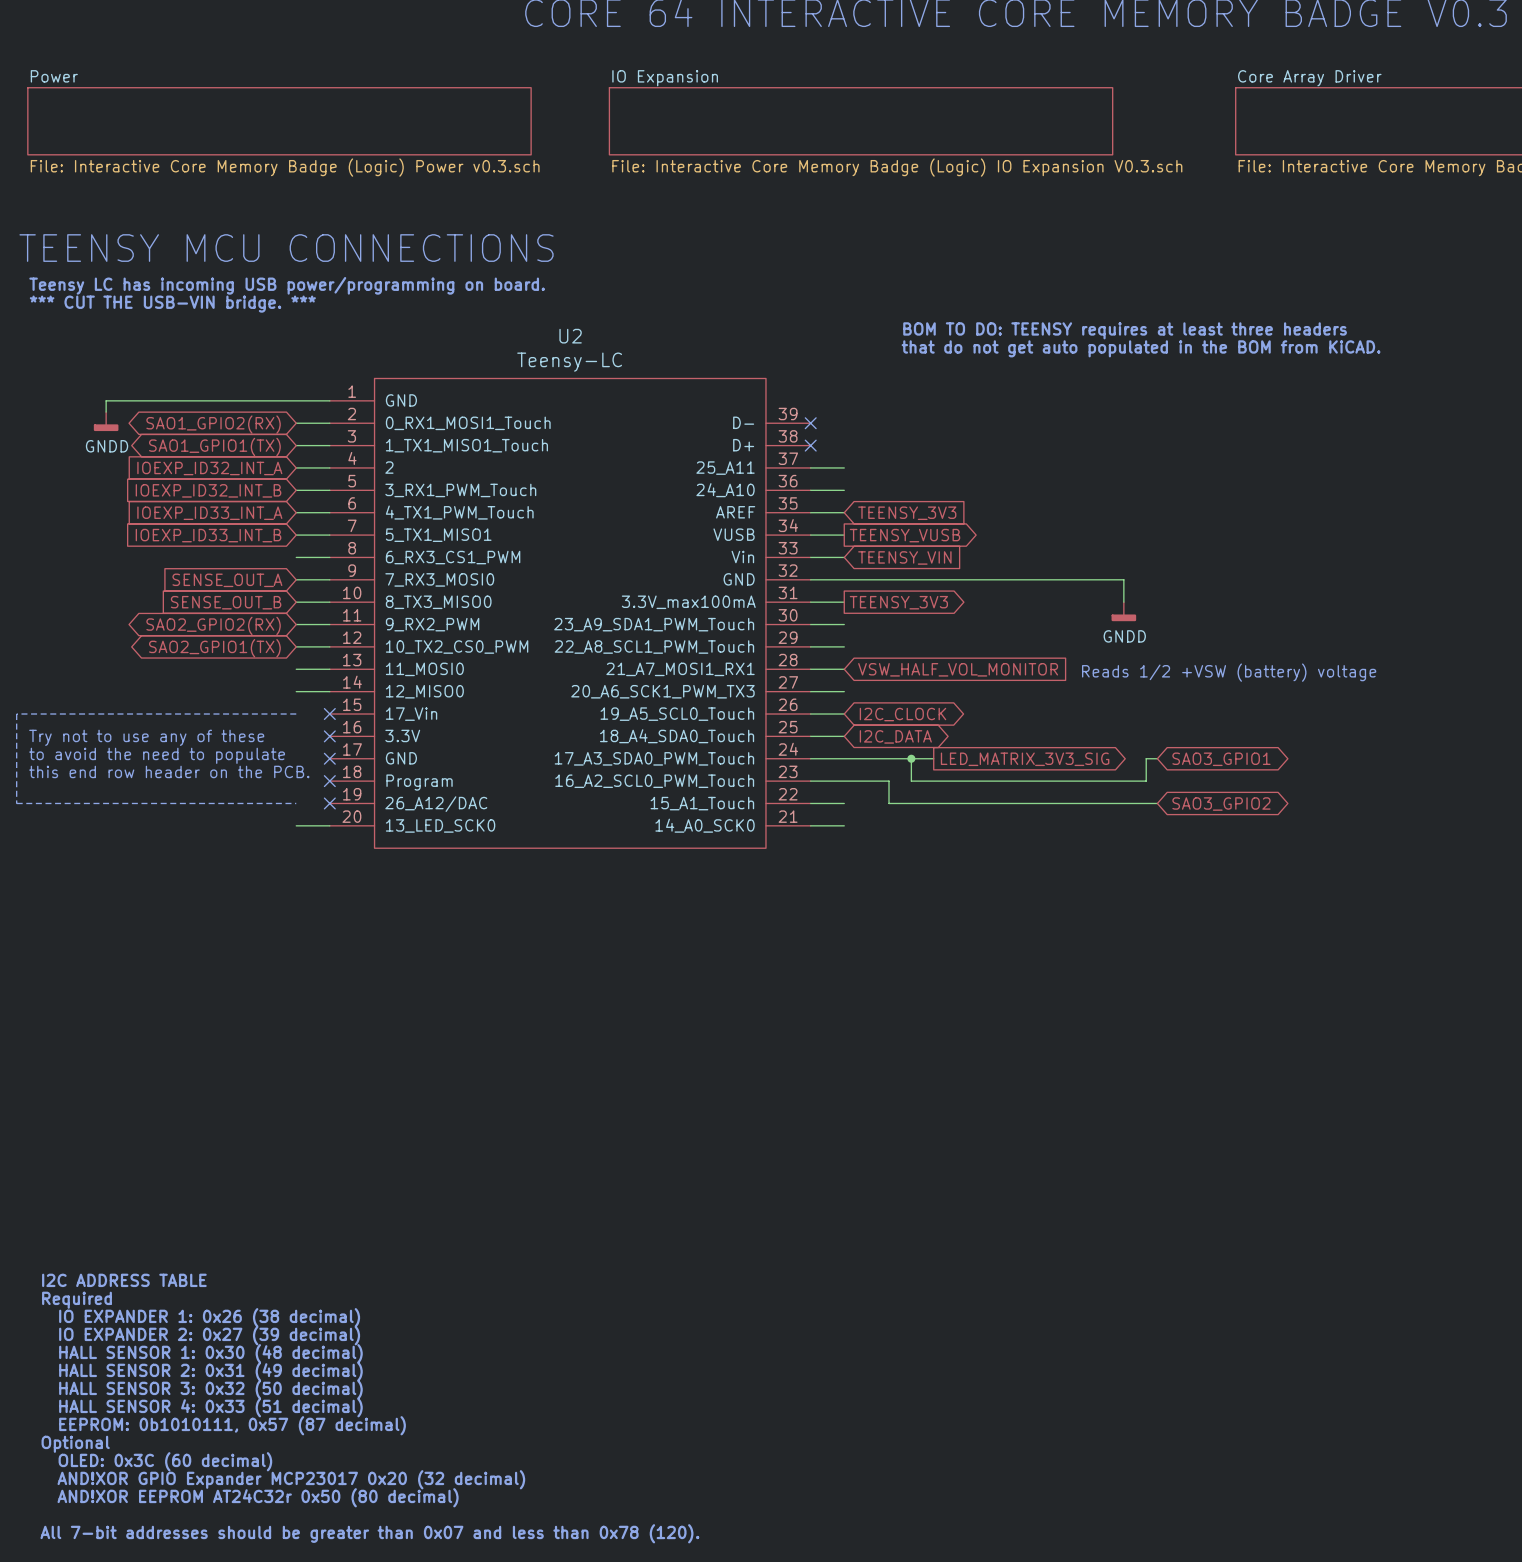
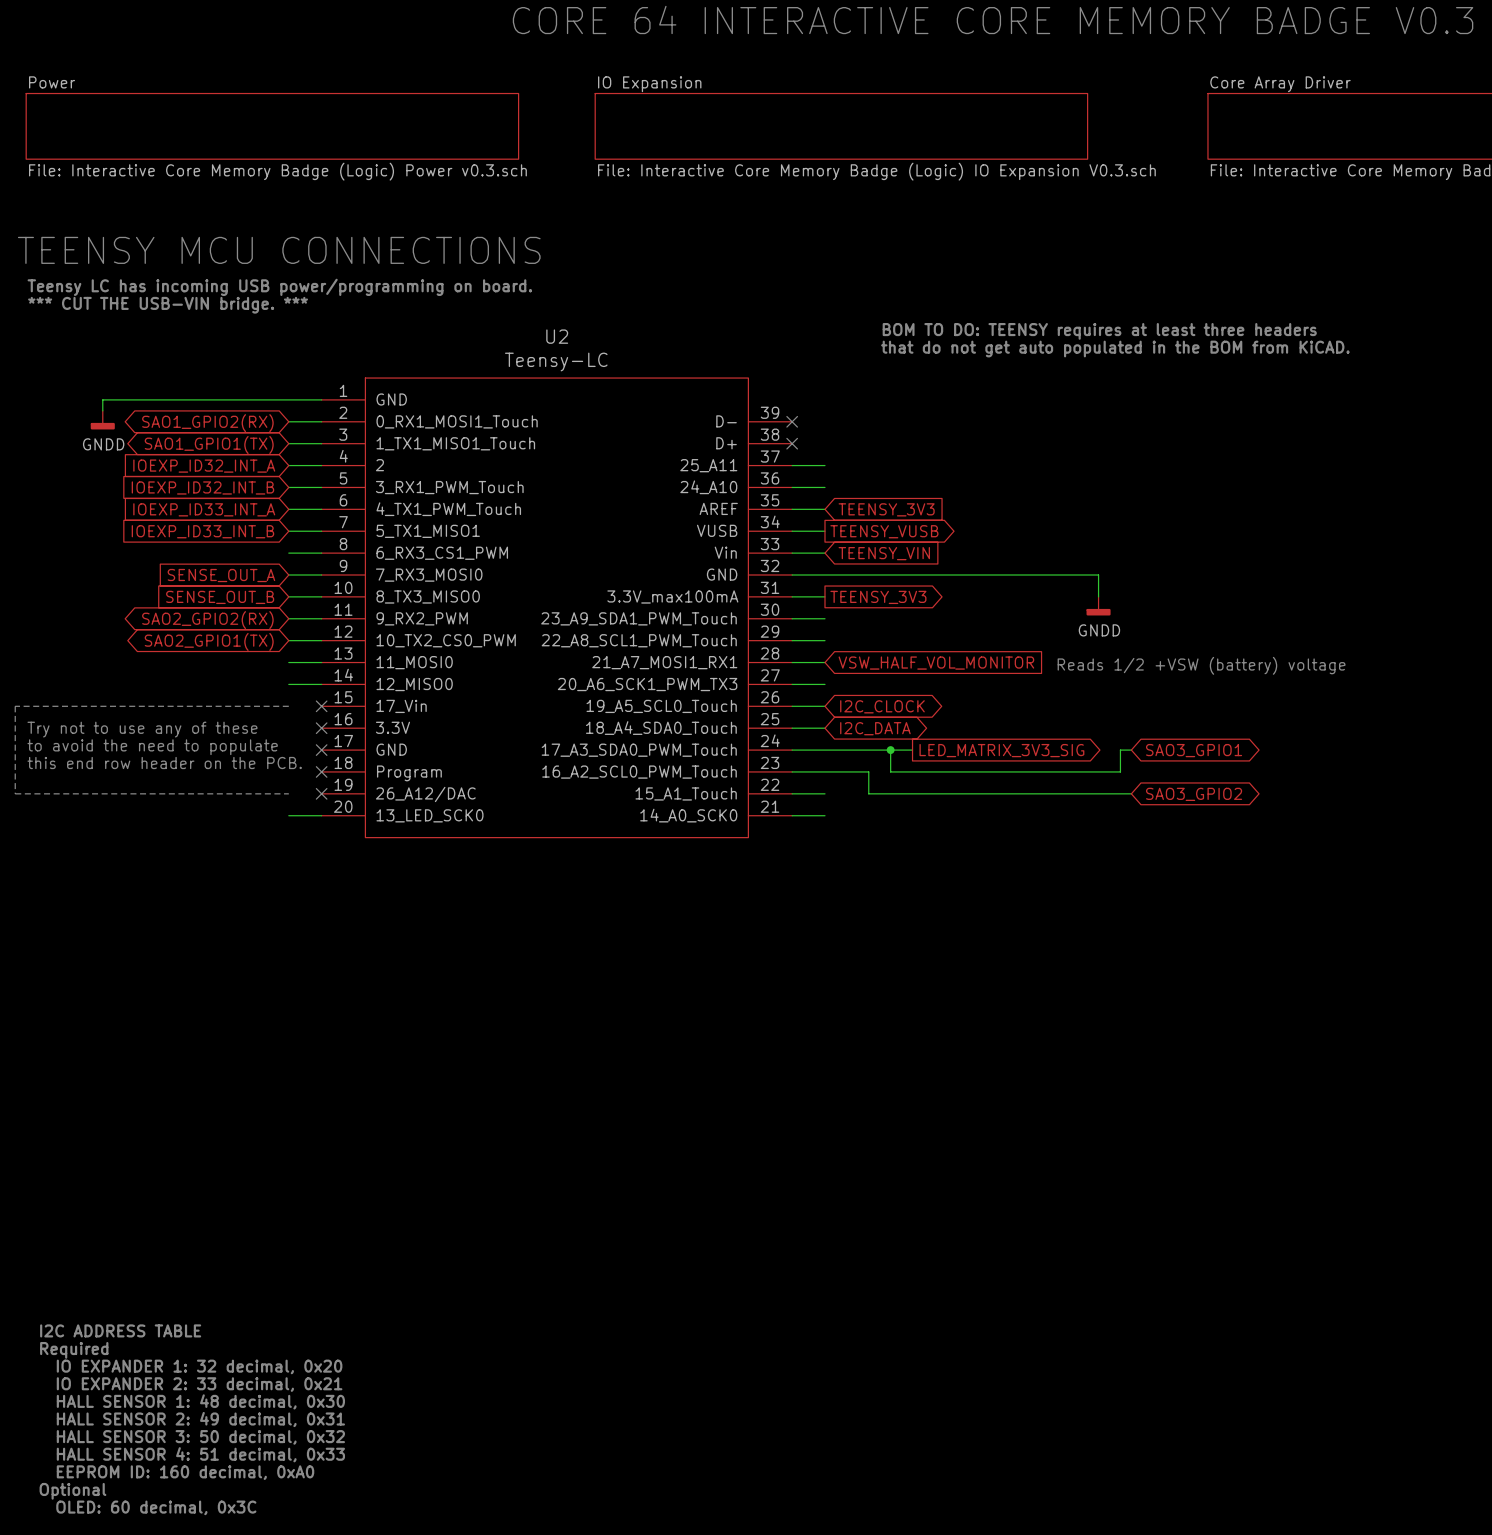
text: I2C ADDRESS TABLE (124, 1280) -> none
text: Required (76, 1300) -> none
text: IO EXPANDER 1: 0x26 (38 decimal) (209, 1317) -> none
text: IO EXPANDER 2: 0x27 (39 decimal) (209, 1335) -> none
text: HALL SENSOR 1: 0x30 (48 decimal) (210, 1353) -> I2C ADDRESS TABLE (120, 1330)
text: HALL SENSOR 2: 0x31 (49 decimal) (210, 1371) -> Required (74, 1350)
text: HALL SENSOR 3: 0x32 (50 decimal) (210, 1389) -> IO EXPANDER 1: 32 decimal, 0x20 (199, 1366)
text: HALL SENSOR 4: 0x33 (51 decimal) (210, 1407) -> IO EXPANDER 2: 33 decimal, 0x21 (199, 1384)
text: EEPROM: 0b1010111, 0x57 (87 decimal) (232, 1425) -> HALL SENSOR 1: 48 decimal, 0x30 (200, 1401)
text: Optional (75, 1444) -> HALL SENSOR 2: 49 decimal, 0x31 (200, 1419)
text: OLED: 0x3C (60 decimal) (165, 1461) -> HALL SENSOR 3: 50 decimal, 0x32 (200, 1437)
text: AND!XOR GPIO Expander MCP23017 0x20 (32 decimal) (291, 1479) -> HALL SENSOR 4: 51 decimal, 0x33 (200, 1454)
text: AND!XOR EEPROM AT24C32r 0x50 (80 decimal) (258, 1497) -> EEPROM ID: 160 decimal, 0xA0 (185, 1472)
text: none -> Optional (72, 1491)
text: All 7-bit addresses should be greater than 0x07 and less than 0x78 (120). (369, 1533) -> OLED: 60 decimal, 0x3C (156, 1507)

